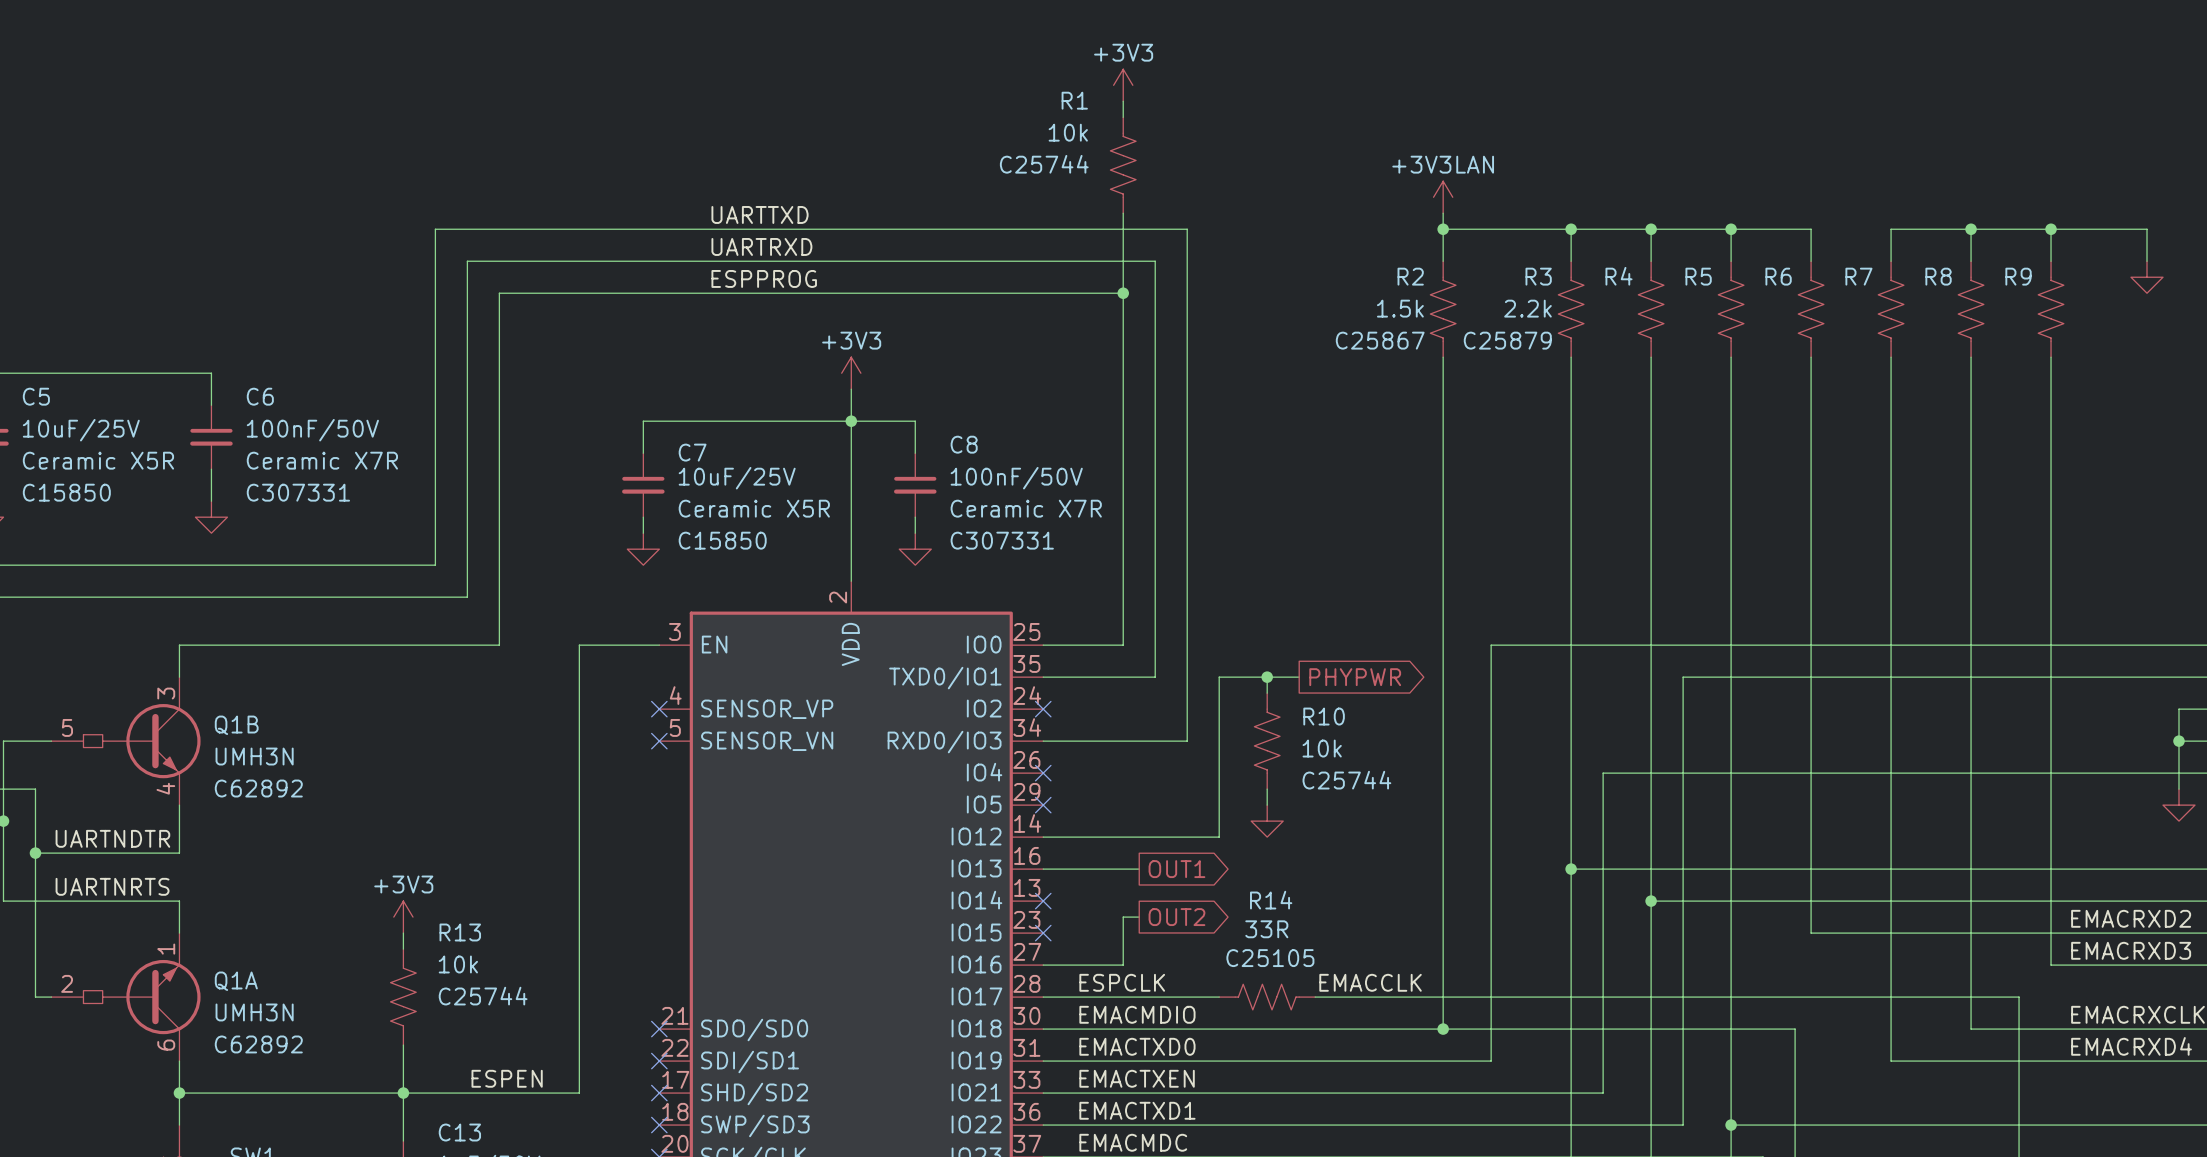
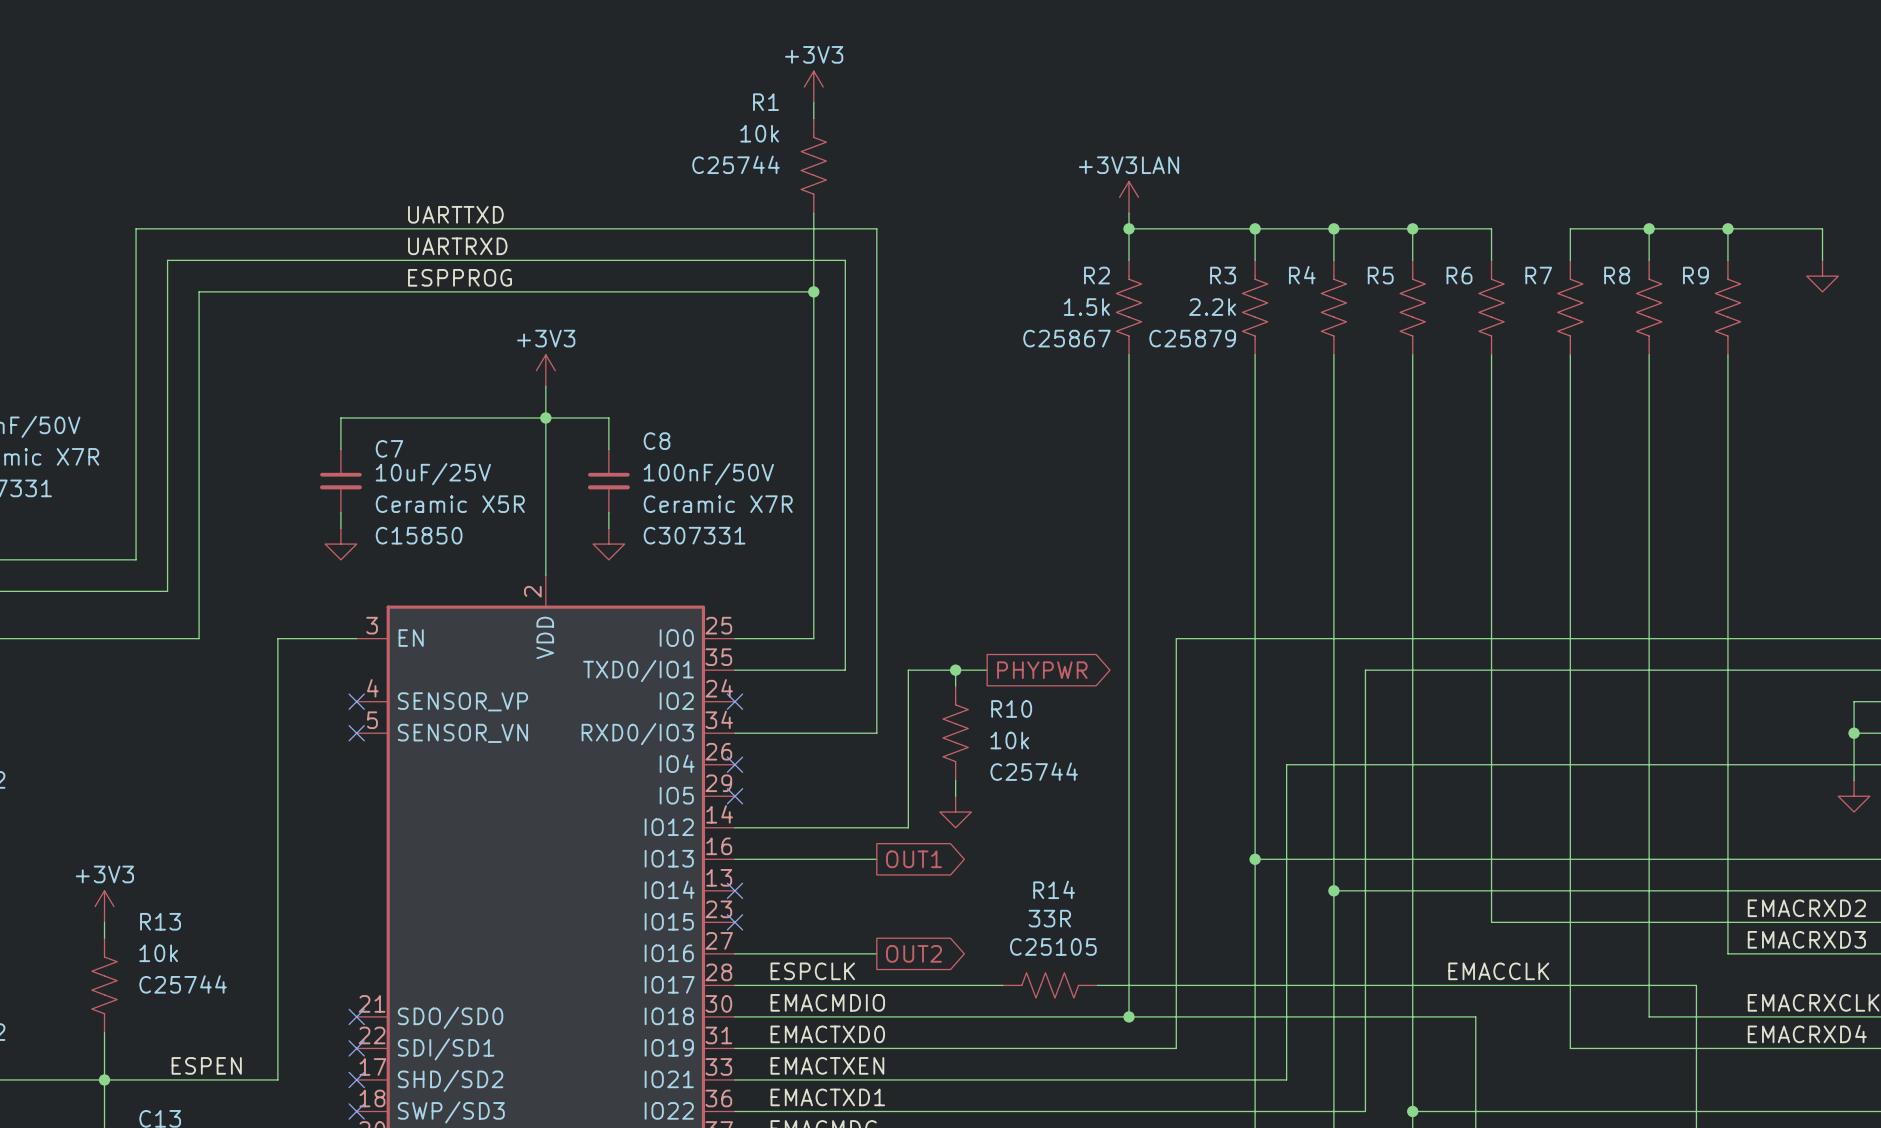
wire: none -> (829, 859) (876, 859)
global label position: OUT1 (1176, 869) -> OUT1 (914, 859)
wire: (1139, 917) (1123, 917) (1123, 965) -> (876, 953) (813, 953)
global label position: OUT2 (1176, 917) -> OUT2 (914, 953)
label: EMACCLK (1370, 982) -> none
label: none -> EMACCLK (1498, 971)
R14 position: (1267, 997) -> (1050, 985)
wire: (1315, 997) (1411, 997) -> (1002, 985) (908, 985)

